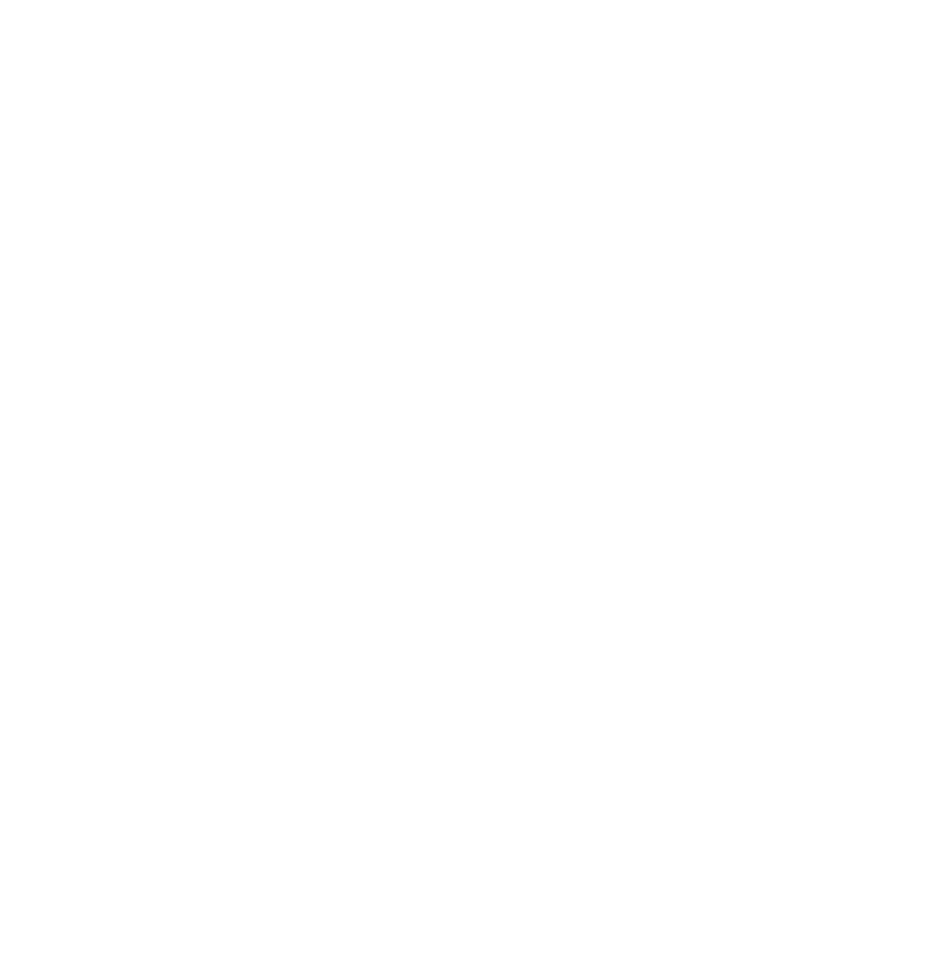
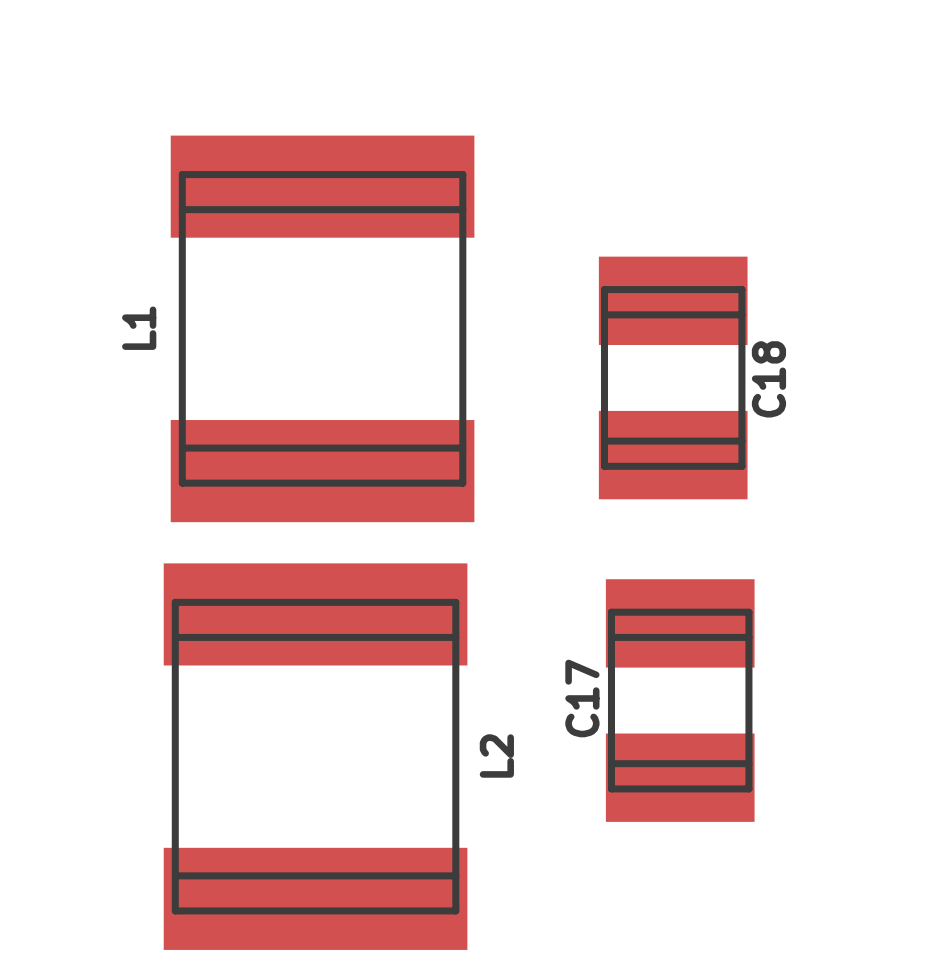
L1: none -> (322, 328)
C18: none -> (673, 377)
C17: none -> (680, 700)
L2: none -> (315, 756)

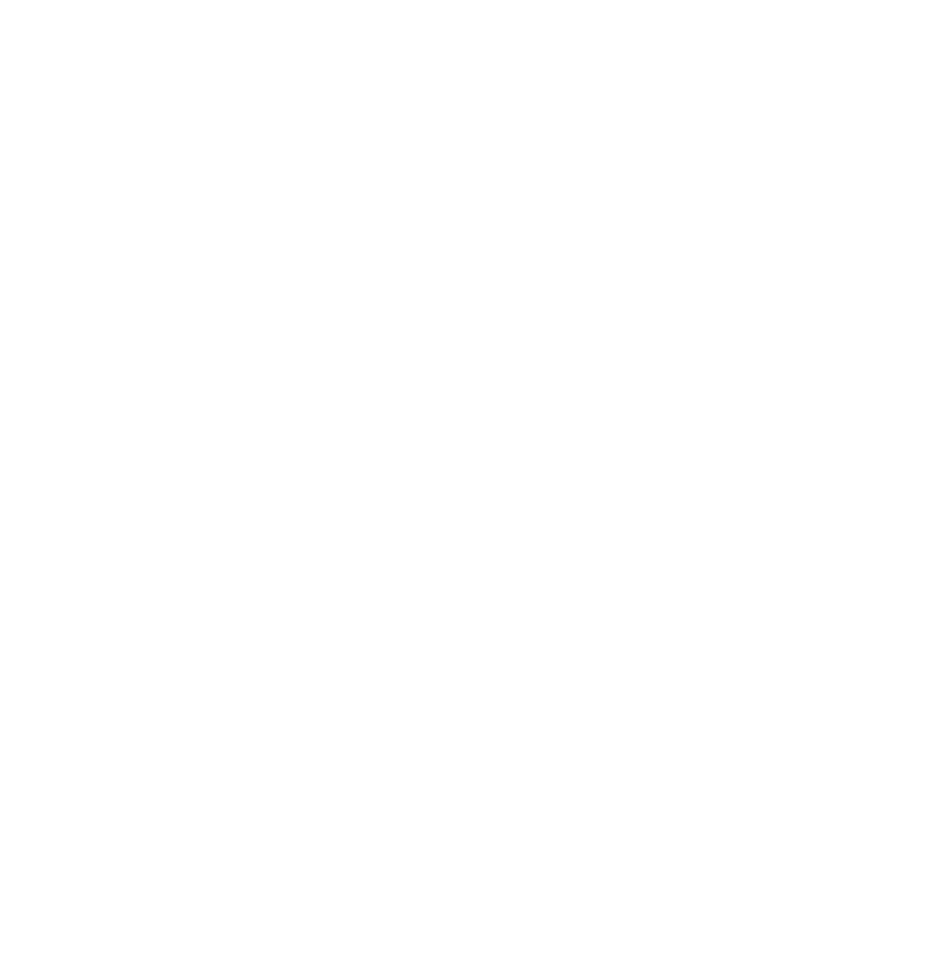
L1: (322, 328) -> none
C18: (673, 377) -> none
C17: (680, 700) -> none
L2: (315, 756) -> none

